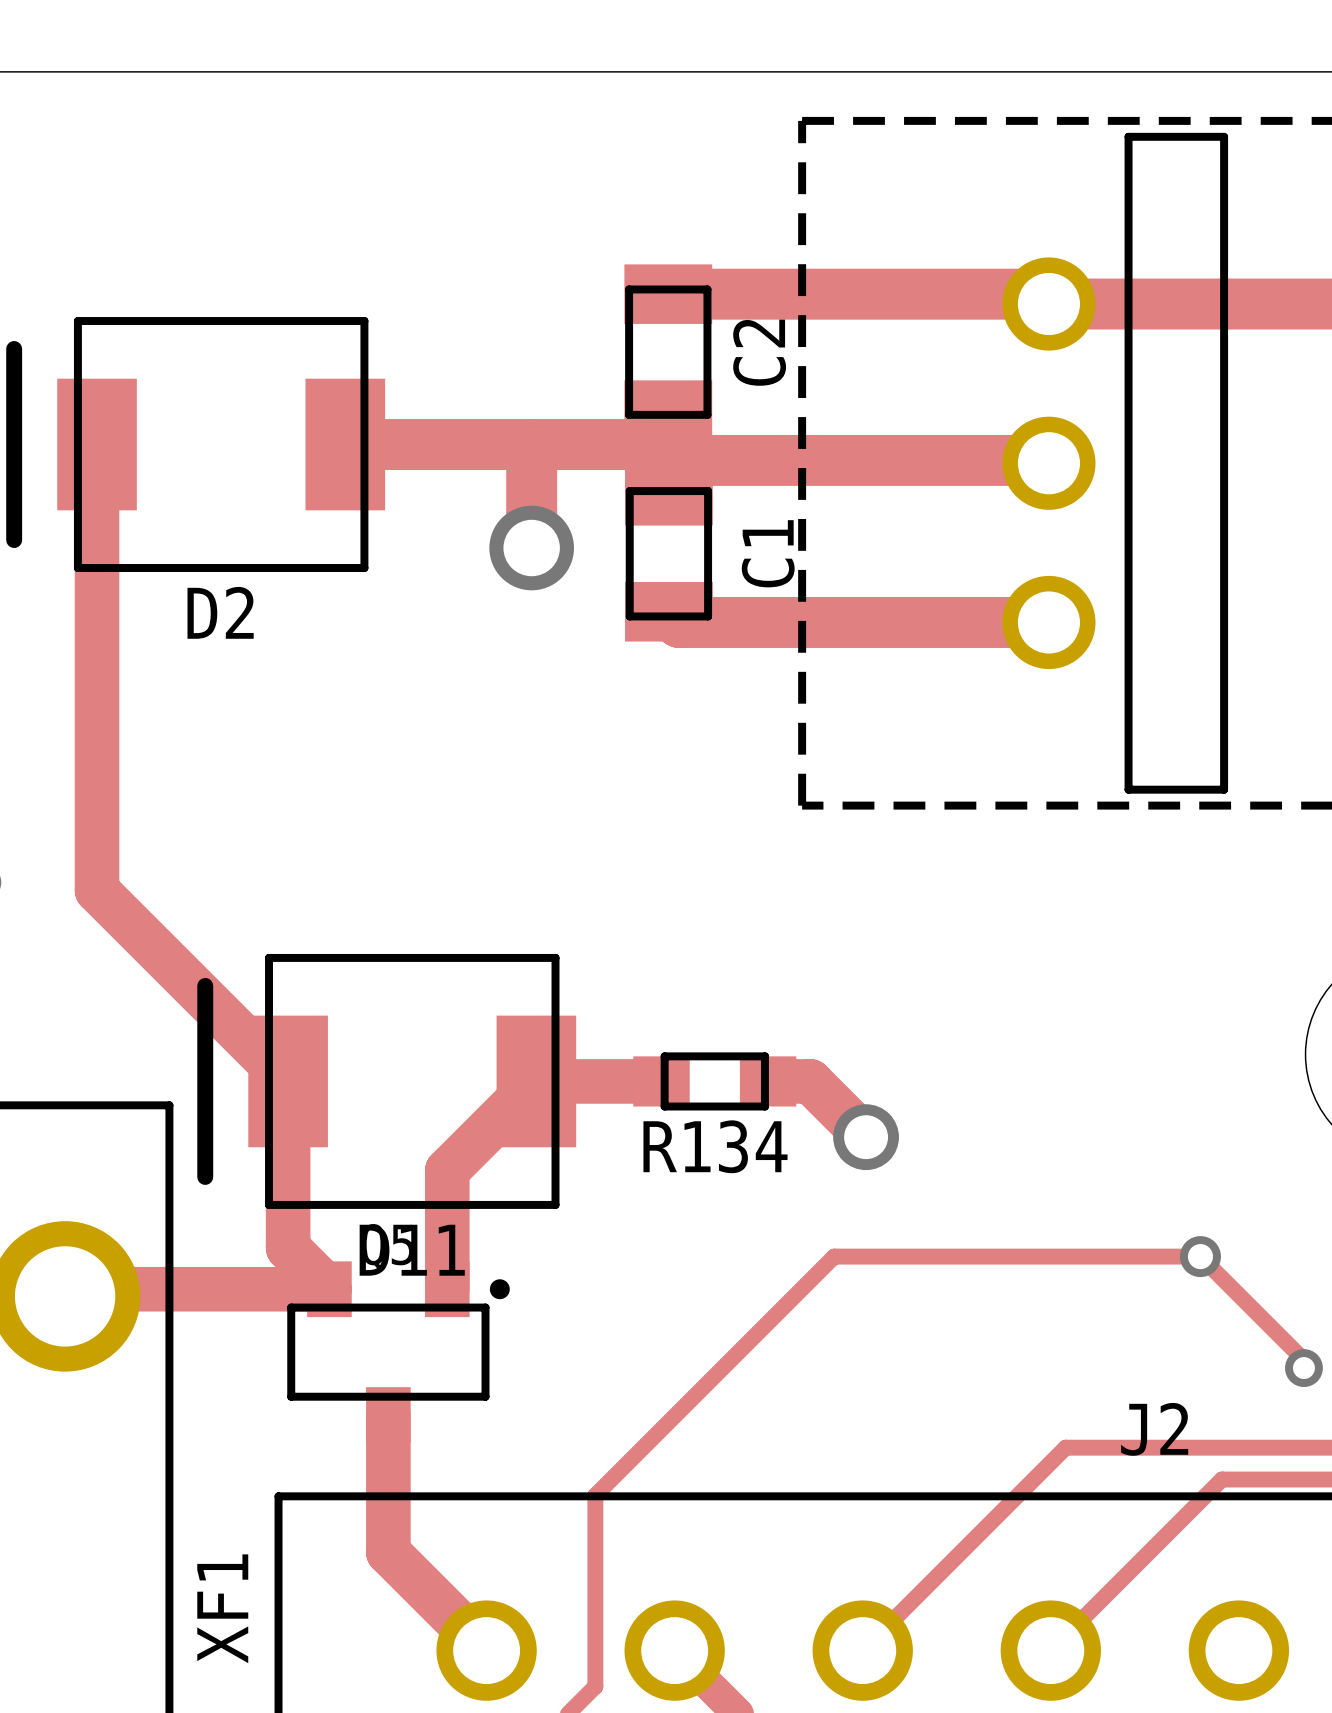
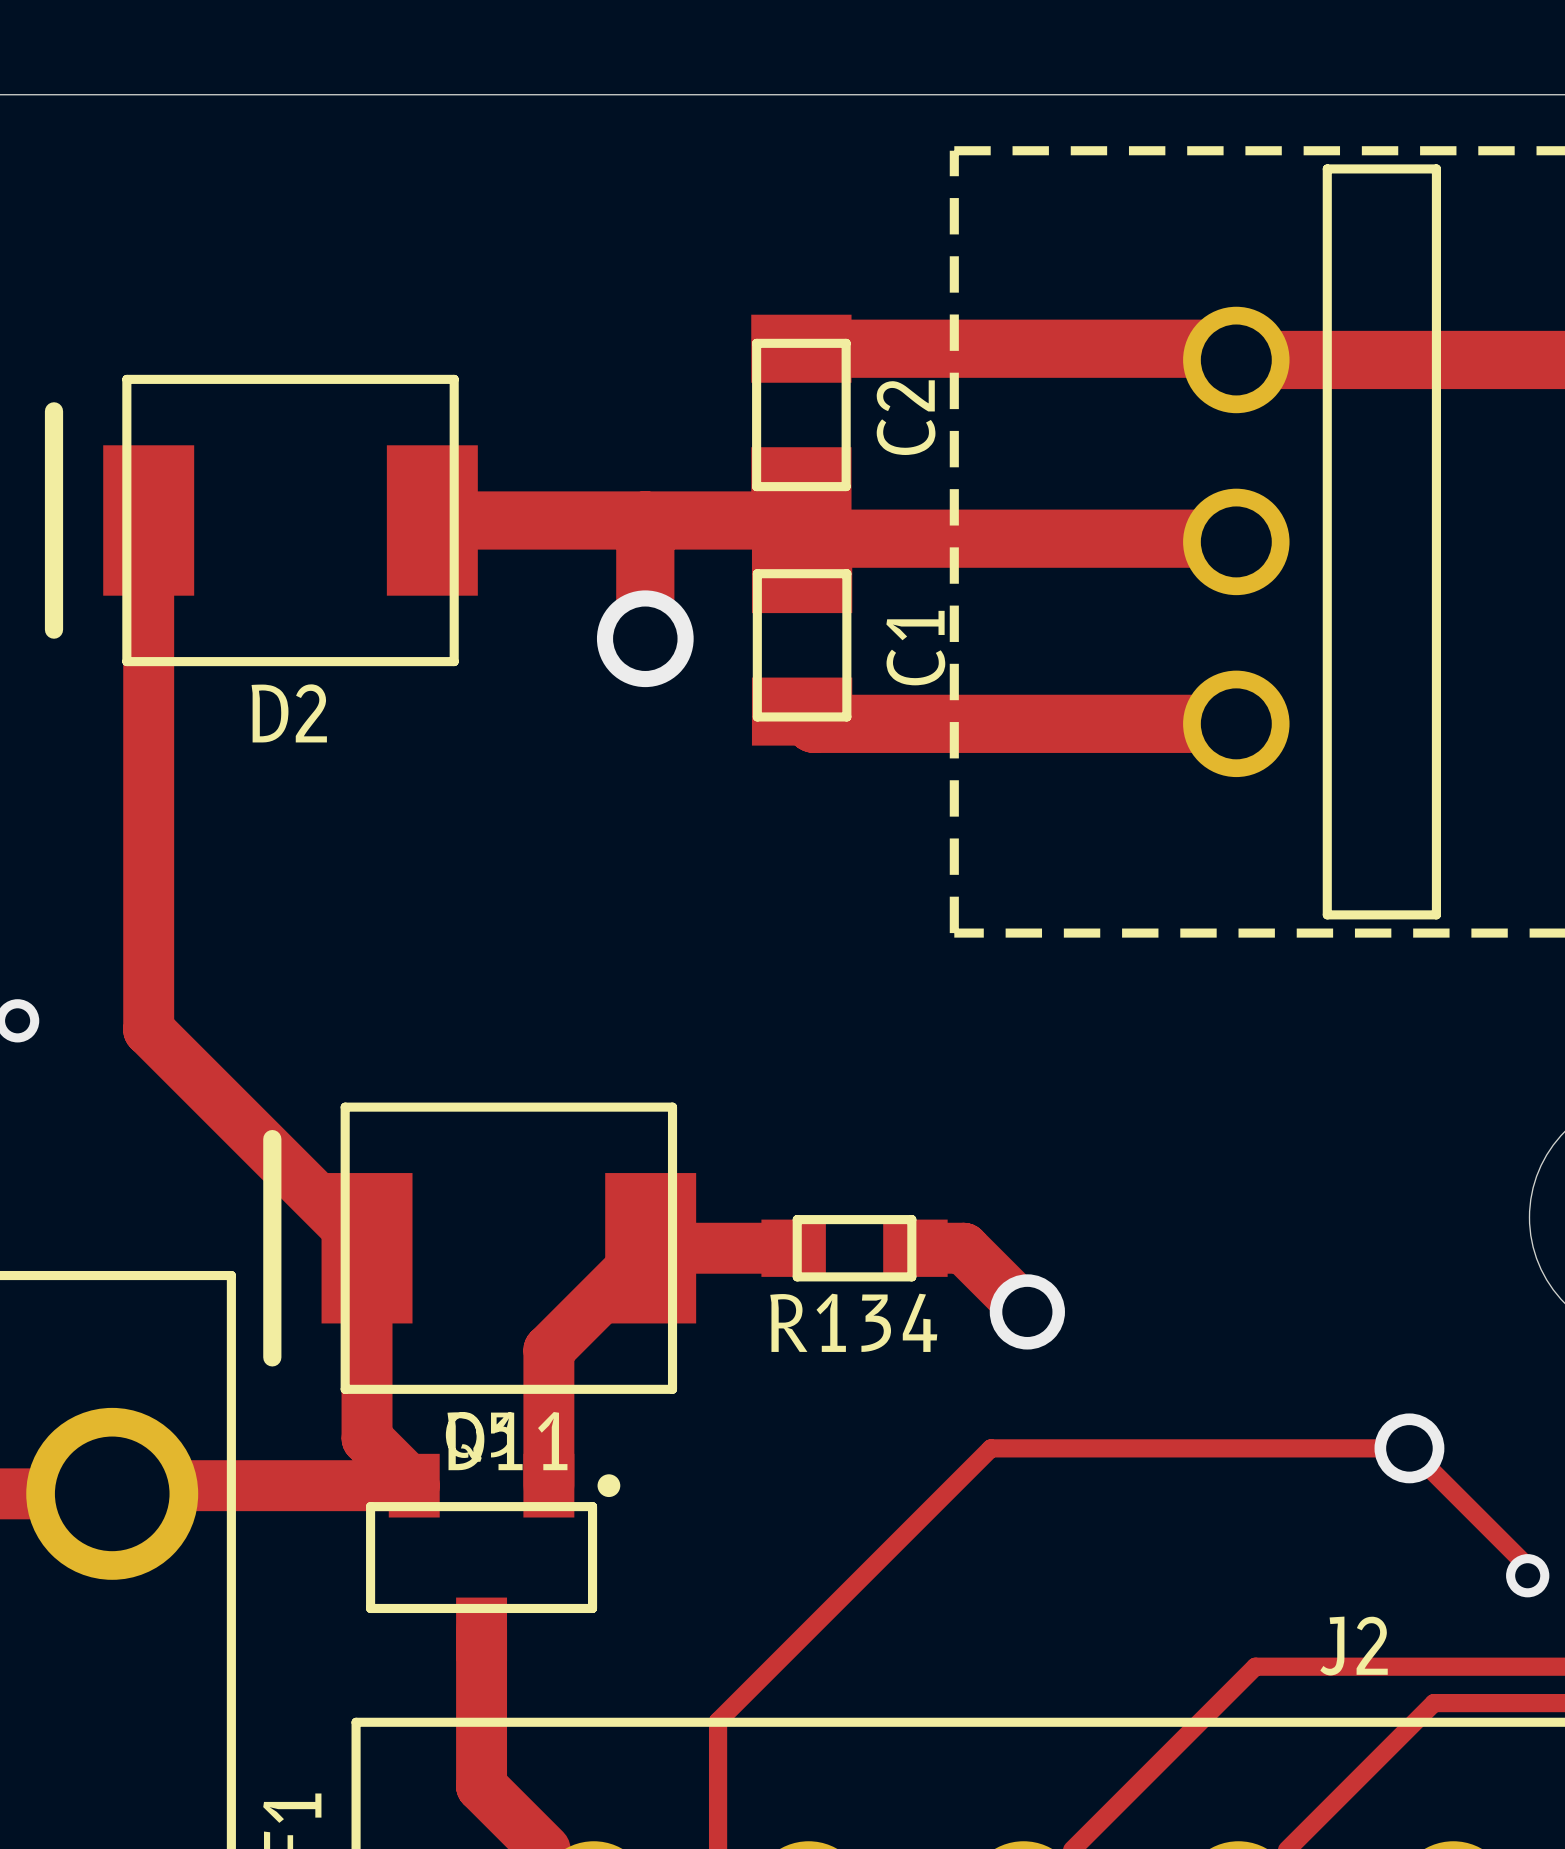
via size: [1179, 1236, 1221, 1278] -> [1374, 1413, 1445, 1484]

